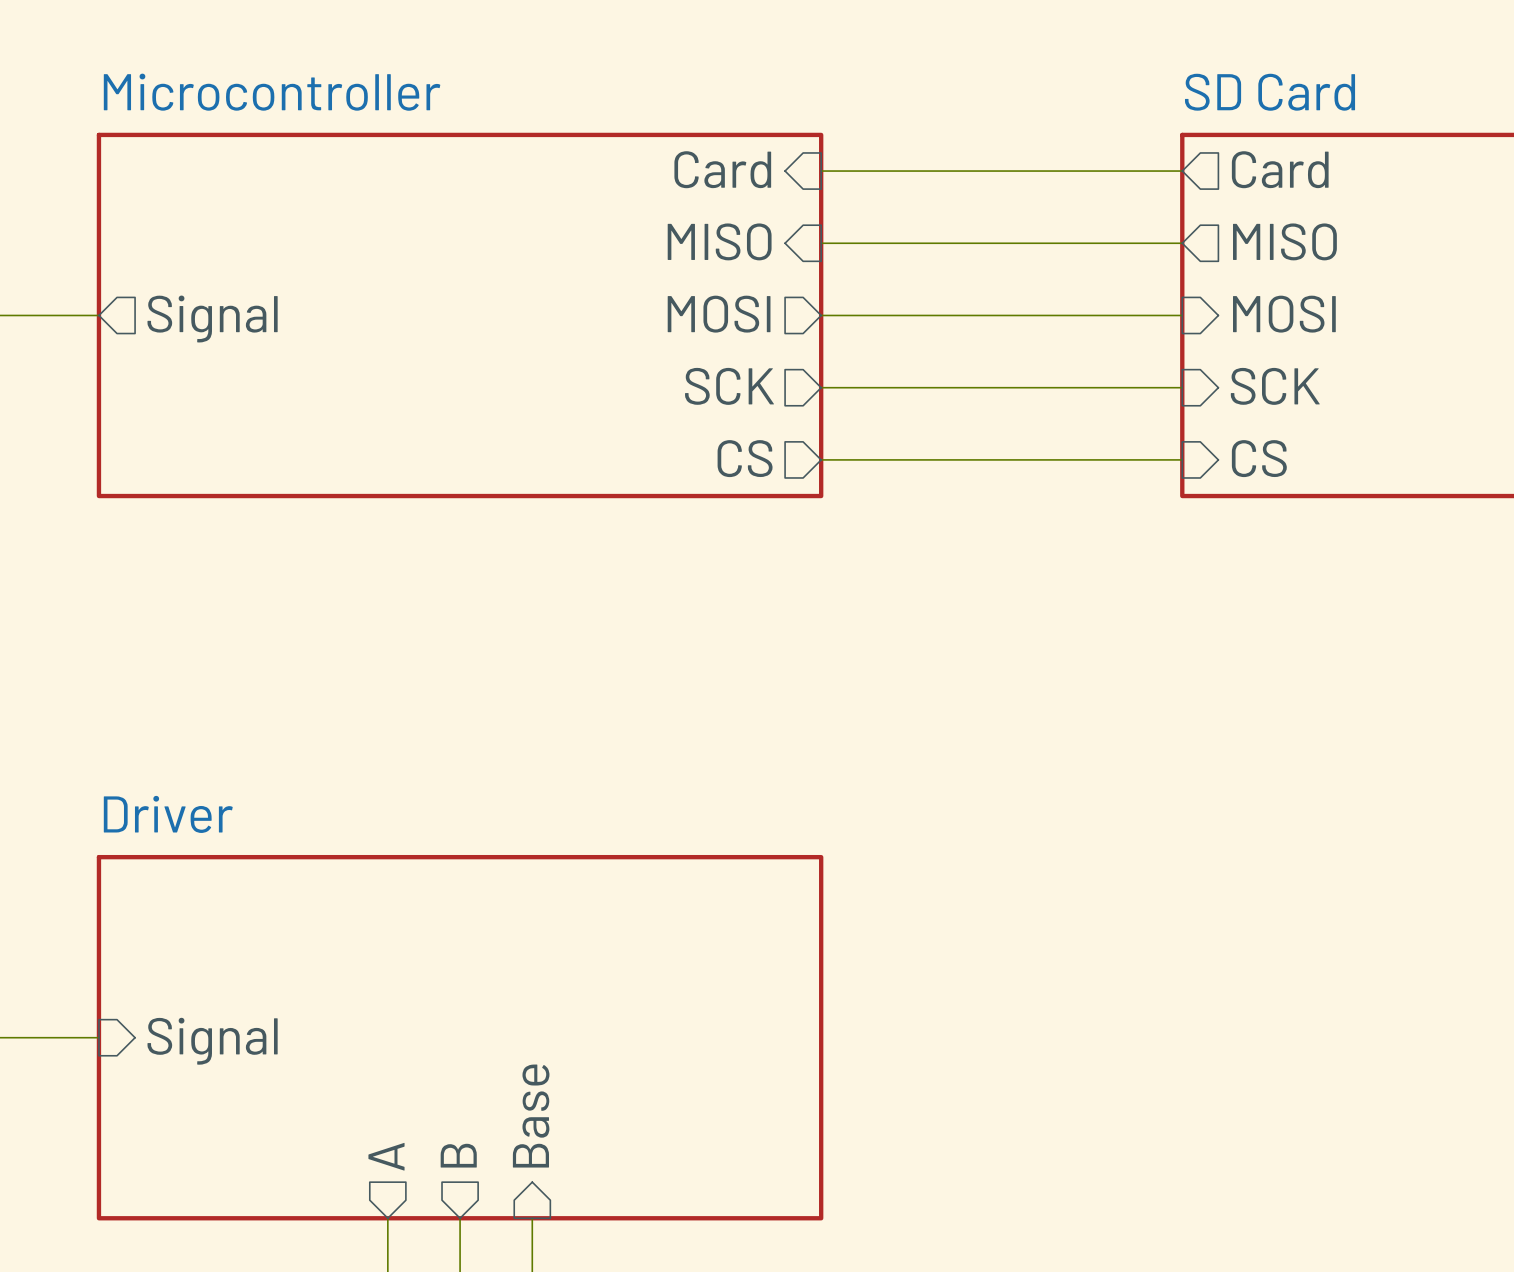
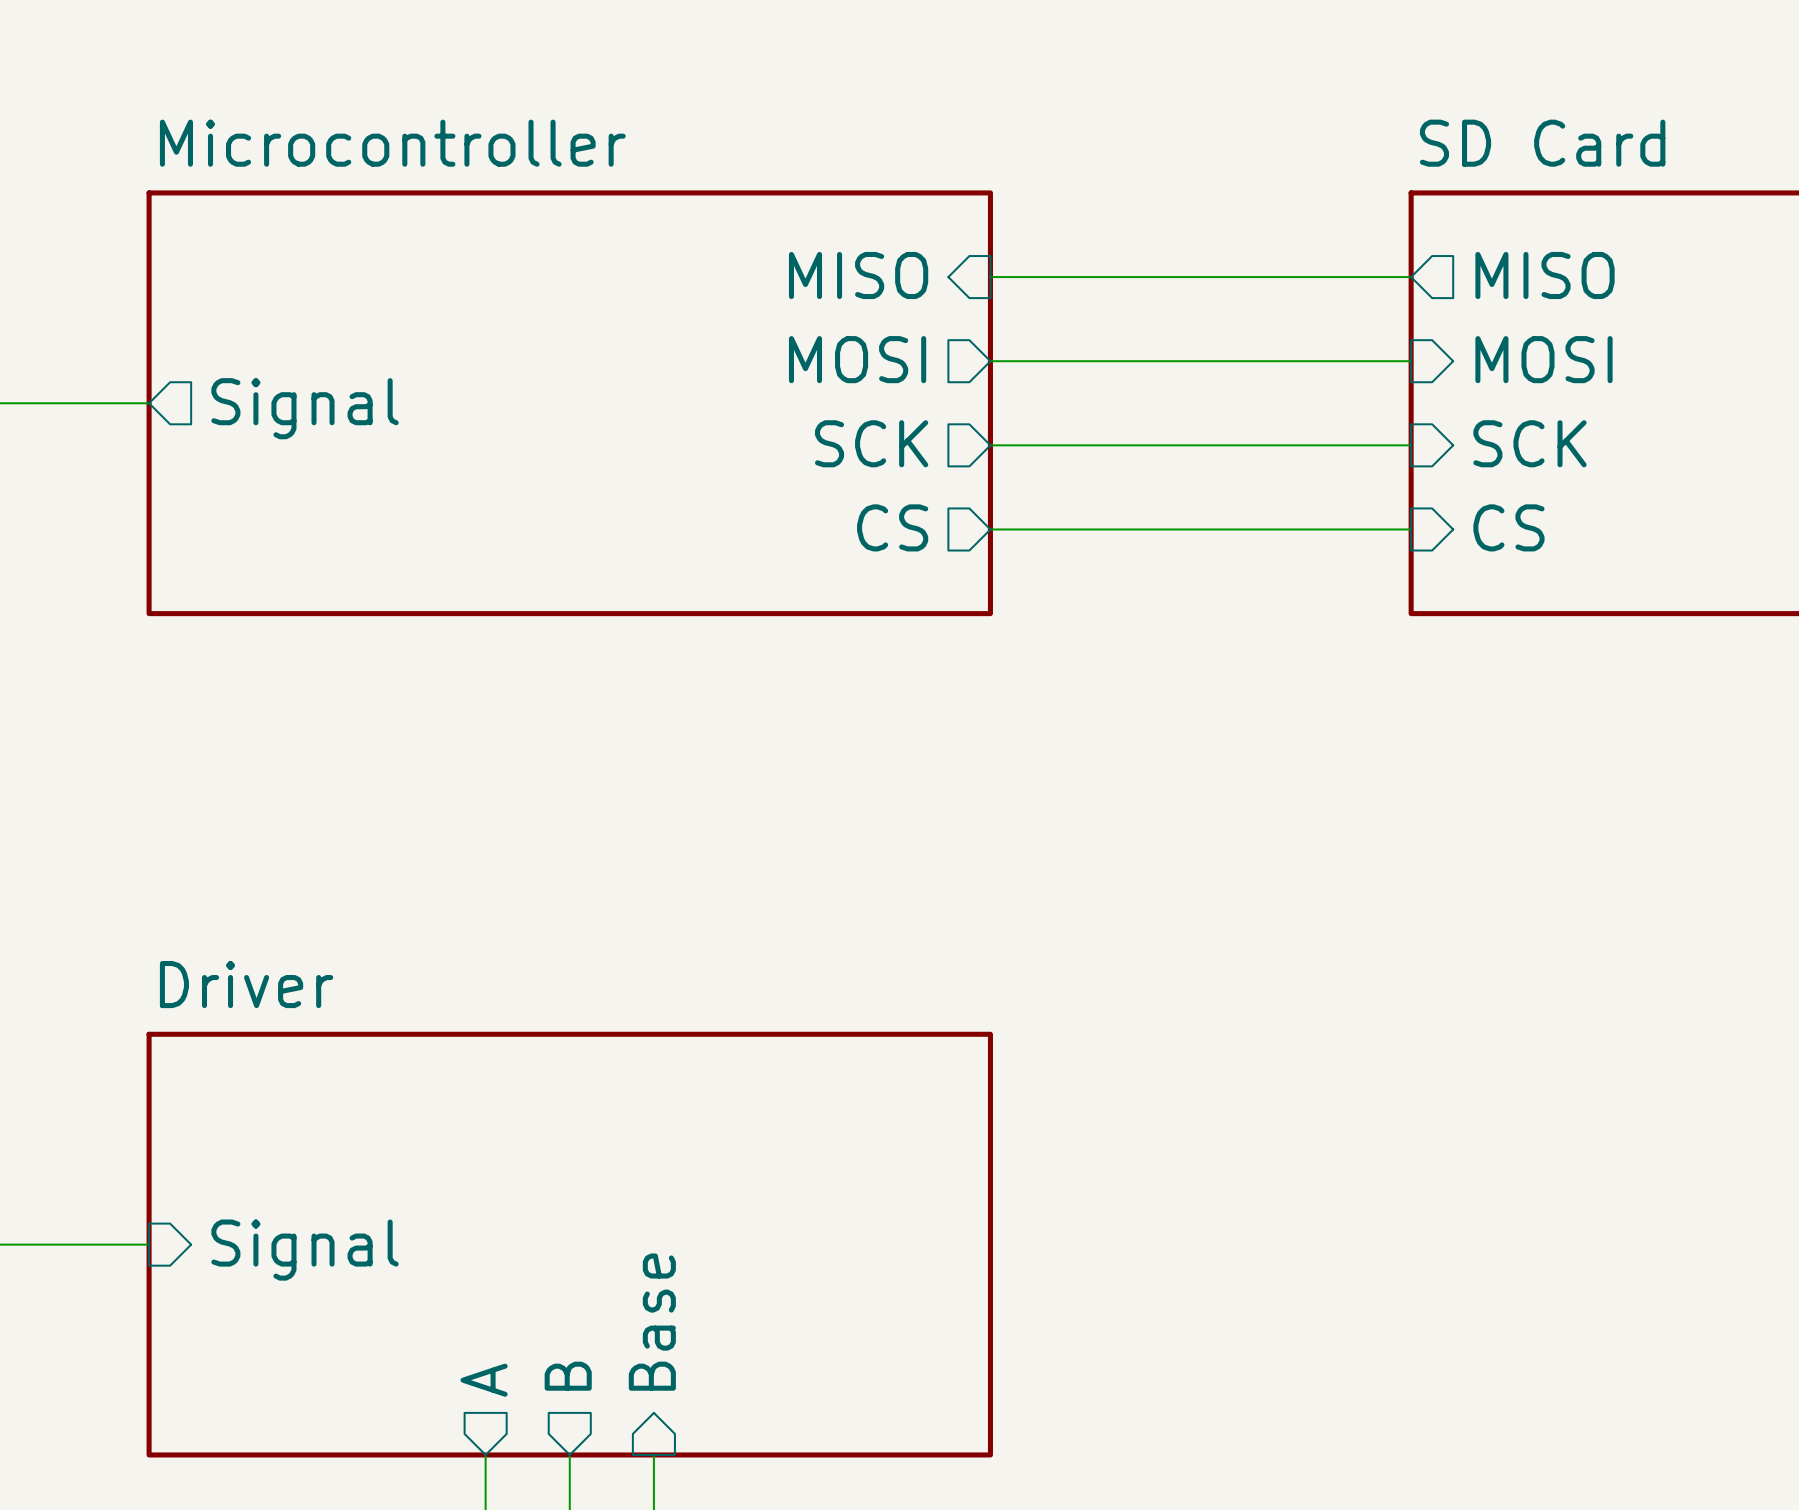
sheet pin: Card (722, 169) -> none
sheet pin: Card (1280, 169) -> none
wire: (821, 171) (1182, 171) -> none
sheet pin position: MISO (719, 241) -> MISO (858, 275)
sheet pin position: MISO (1284, 241) -> MISO (1545, 275)
wire: (821, 243) (1182, 243) -> (990, 277) (1411, 277)
sheet pin position: MOSI (719, 314) -> MOSI (857, 359)
sheet pin position: MOSI (1284, 314) -> MOSI (1544, 359)
wire: (821, 315) (1182, 315) -> (990, 361) (1411, 361)
sheet pin position: SCK (729, 386) -> SCK (871, 443)
sheet pin position: SCK (1275, 386) -> SCK (1529, 443)
wire: (821, 387) (1182, 387) -> (990, 445) (1411, 445)
sheet pin position: CS (745, 458) -> CS (892, 527)
sheet pin position: CS (1259, 458) -> CS (1508, 527)
wire: (821, 459) (1182, 459) -> (990, 529) (1411, 529)

